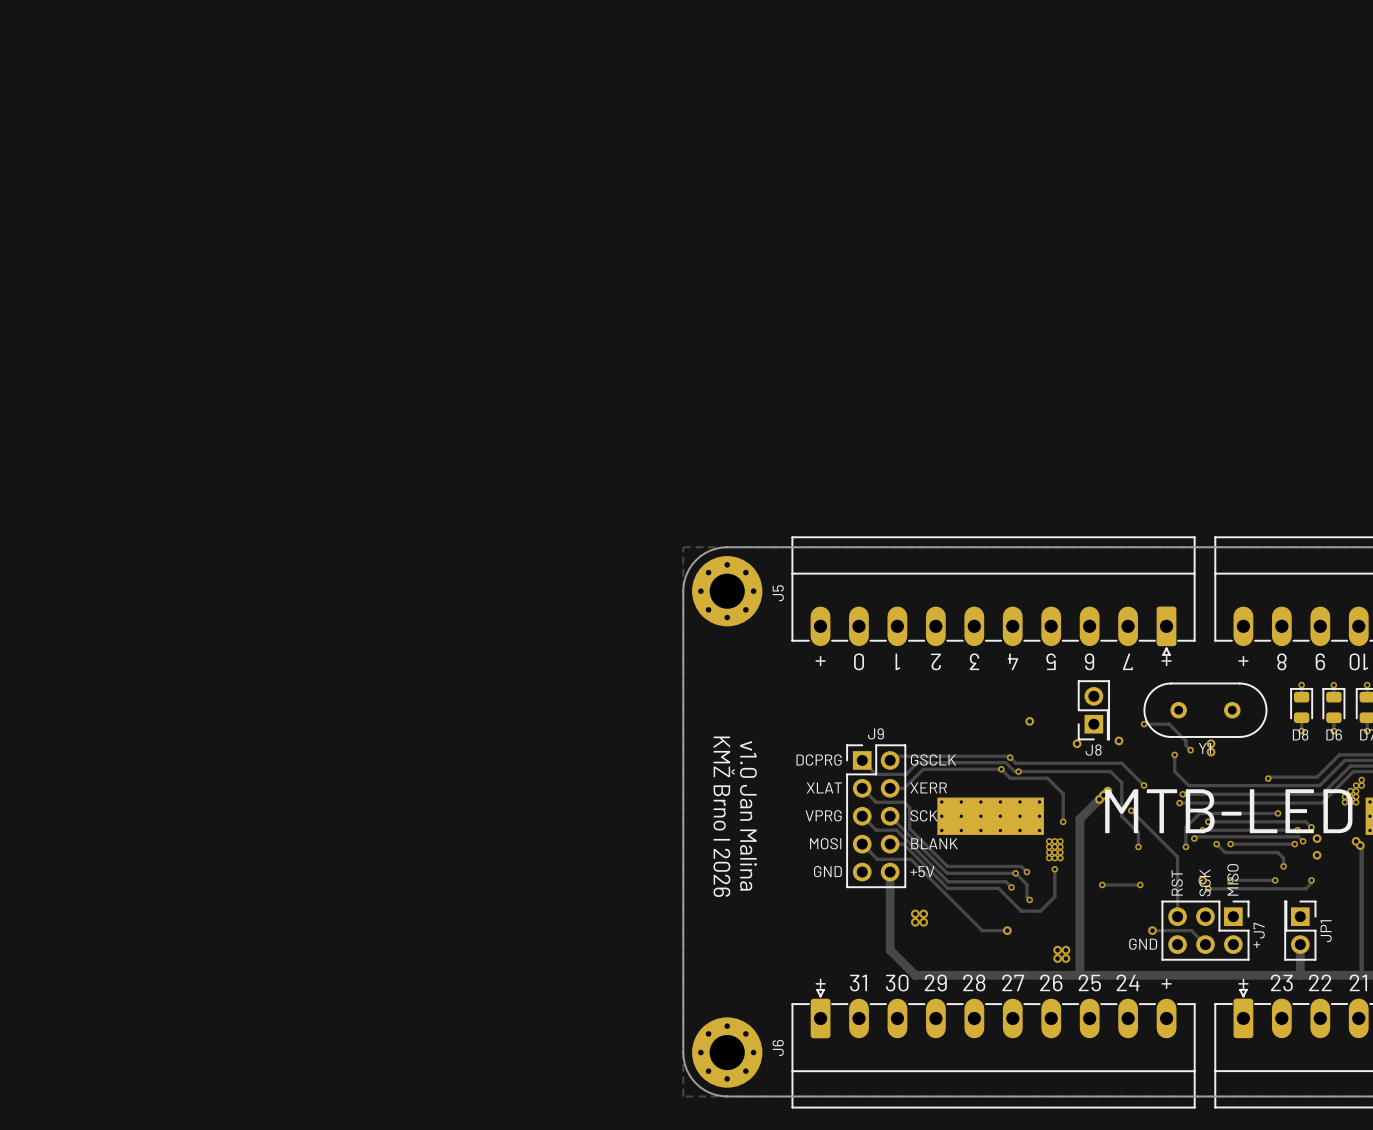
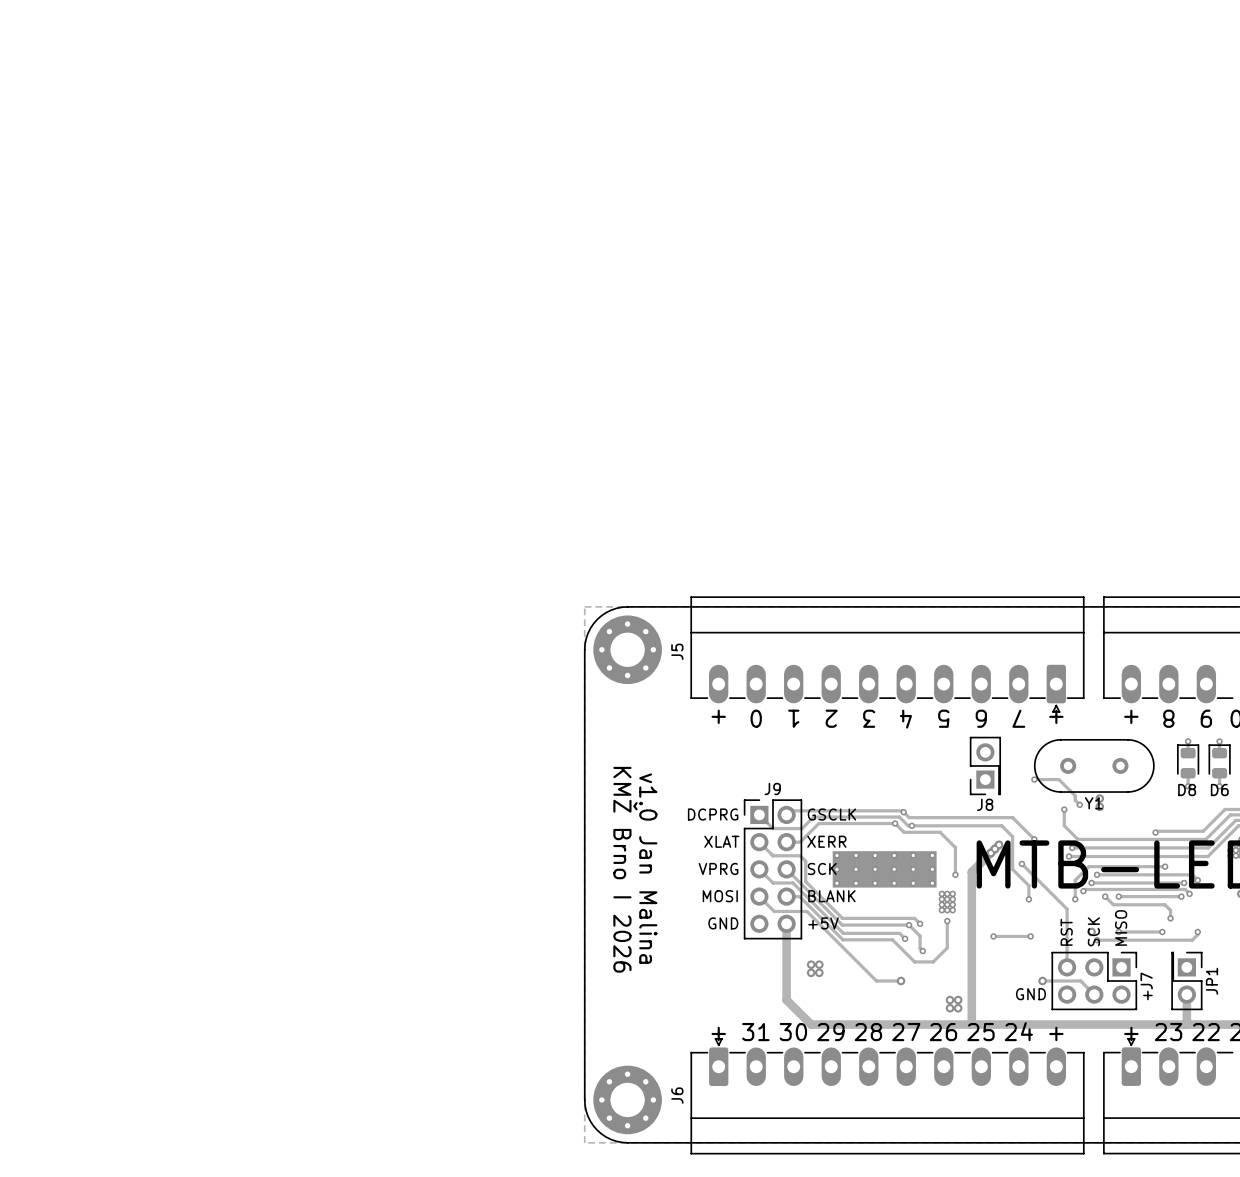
via: (1029, 721) -> none
via: (1118, 740) -> none
via: (1077, 743) -> none
via: (1317, 838) -> none
via: (1317, 855) -> none

